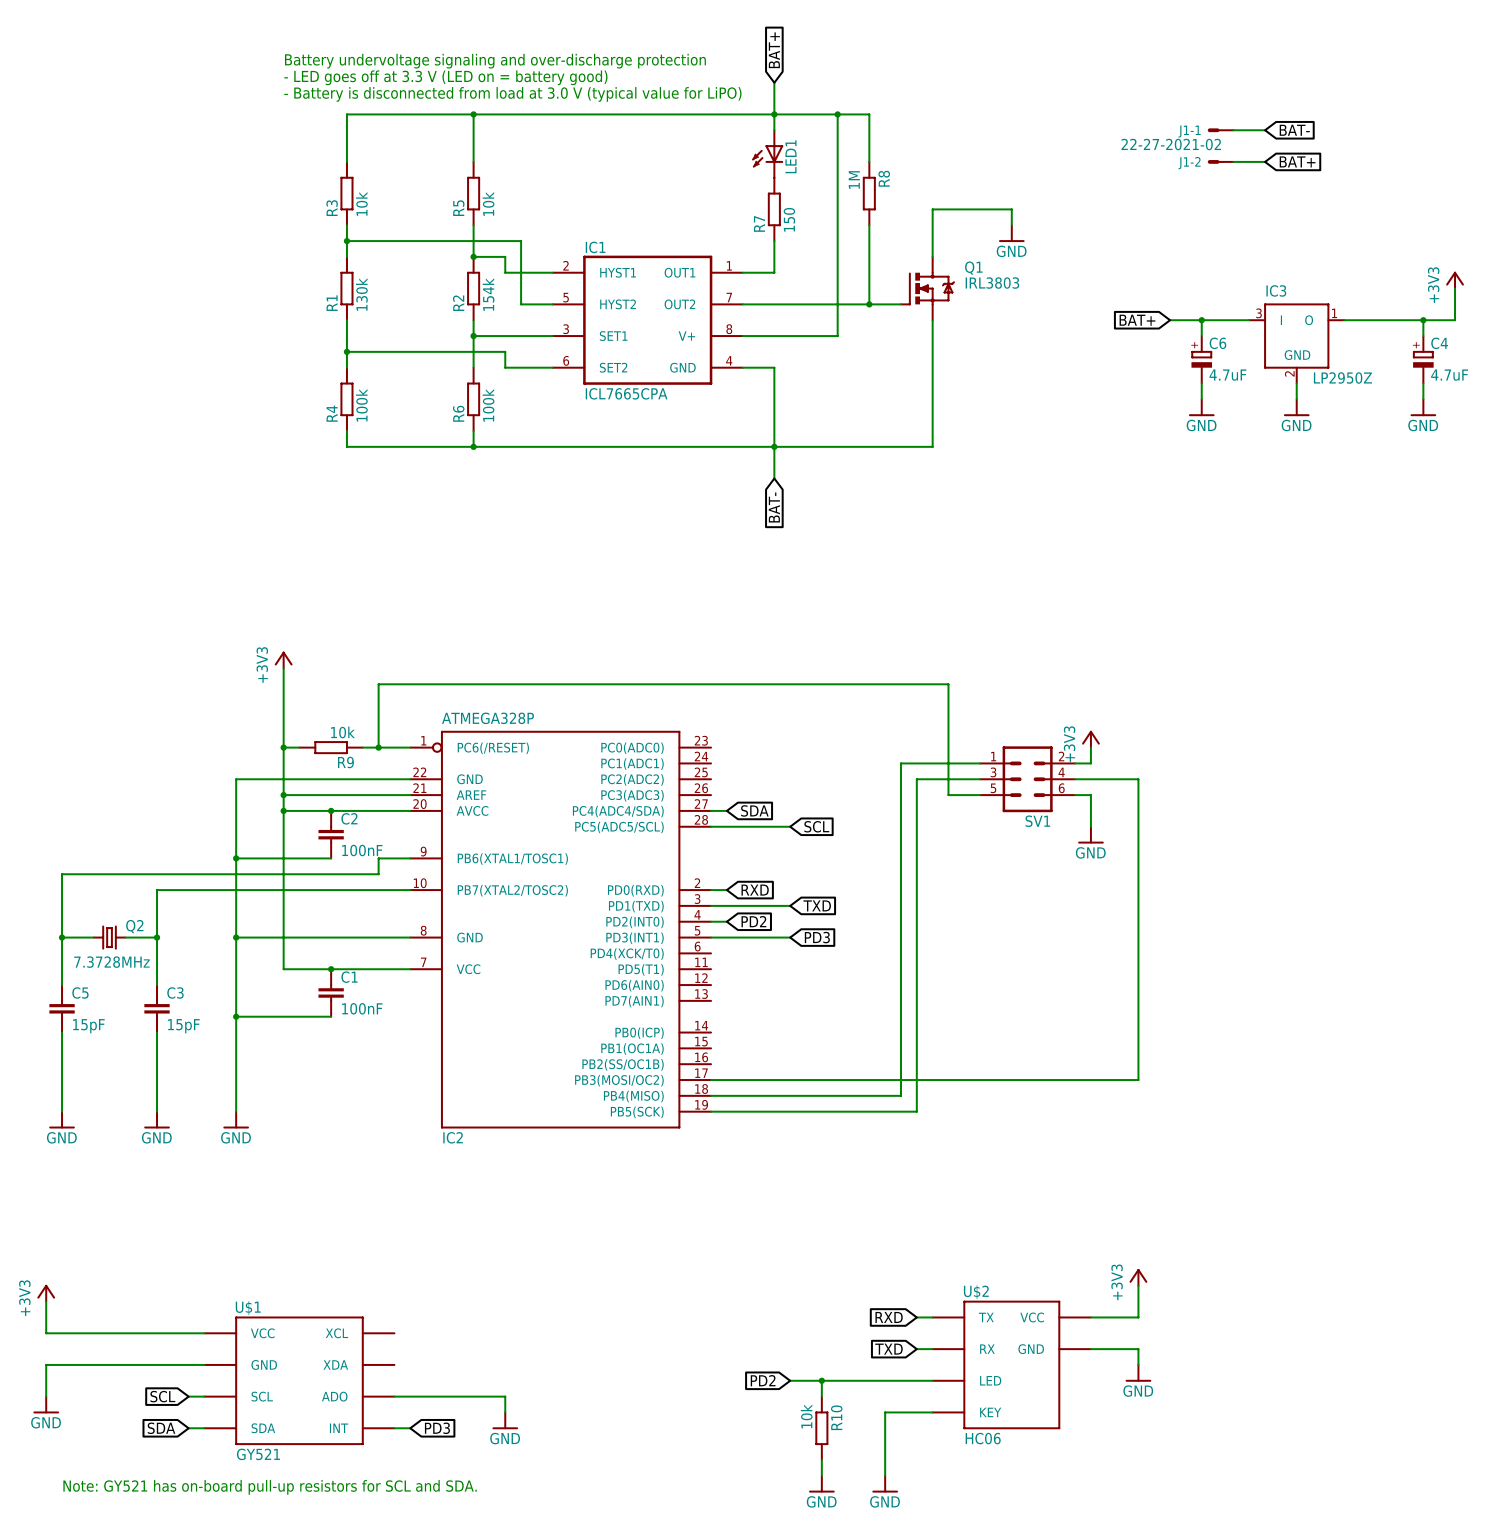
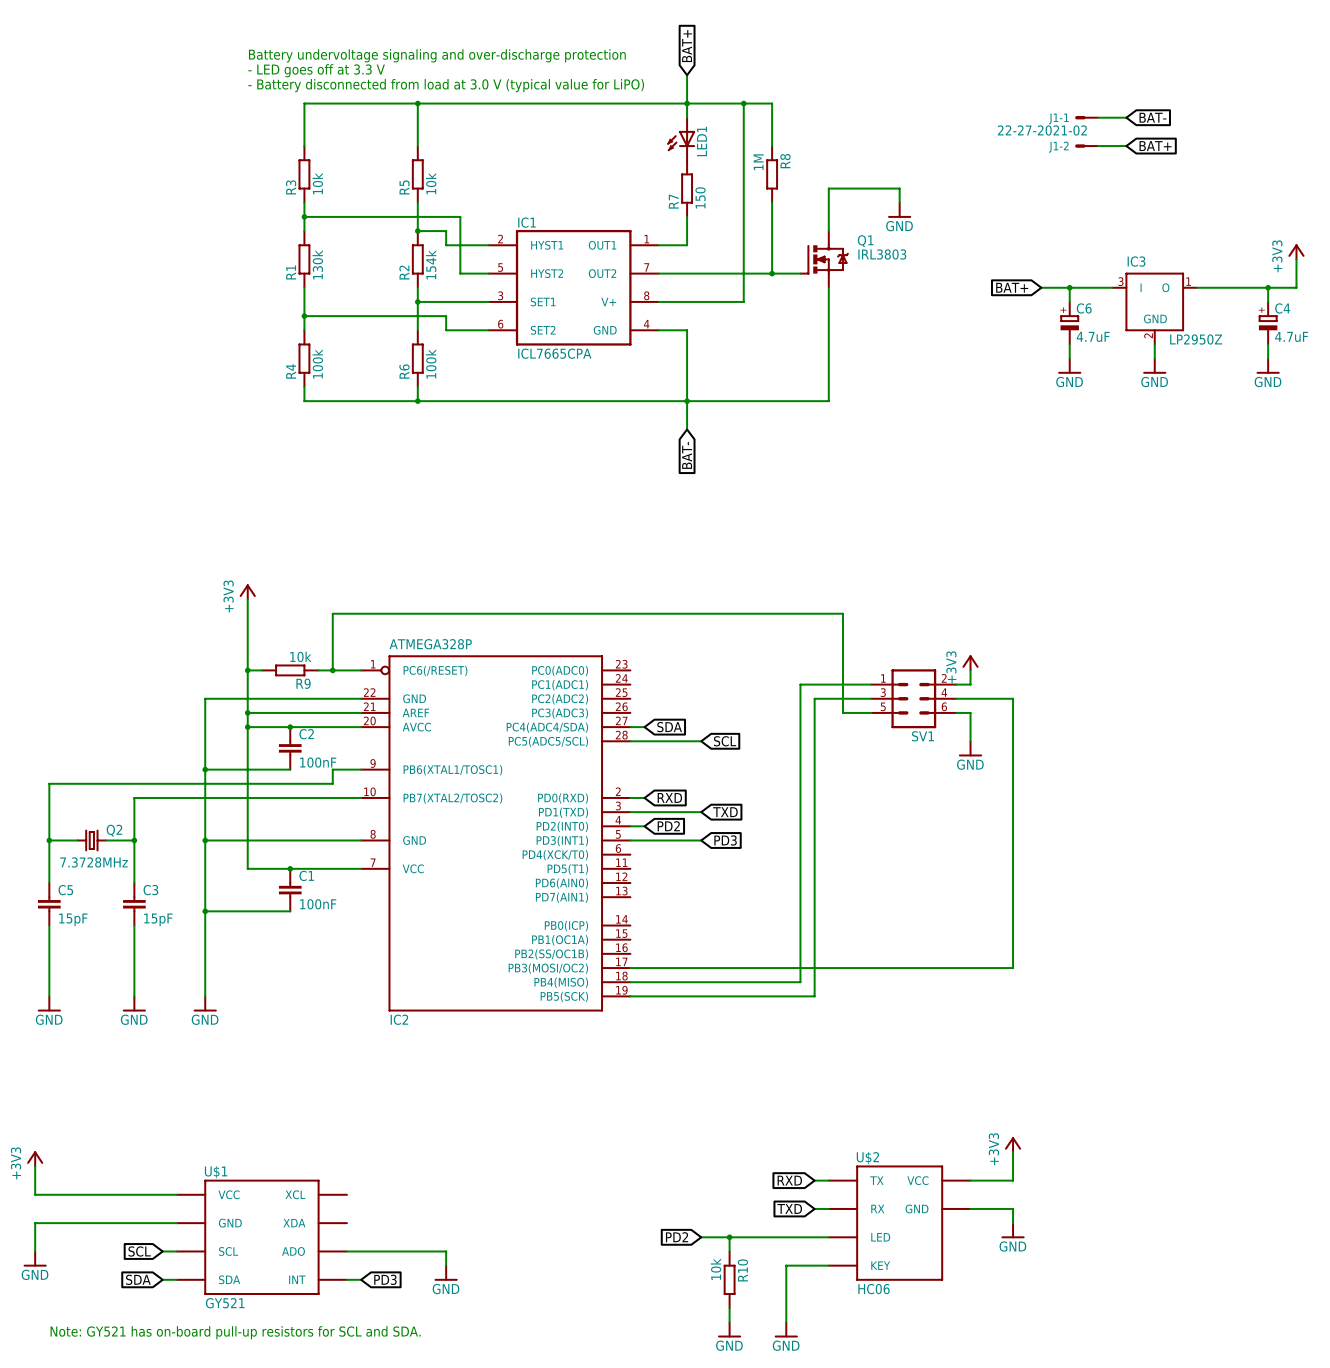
text: - LED goes off at 3.3 V (LED on = battery good) (445, 77) -> - LED goes off at 3.3 V (316, 70)
text: - Battery is disconnected from load at 3.0 V (typical value for LiPO) (512, 94) -> - Battery disconnected from load at 3.0 V (typical value for LiPO) (446, 85)

